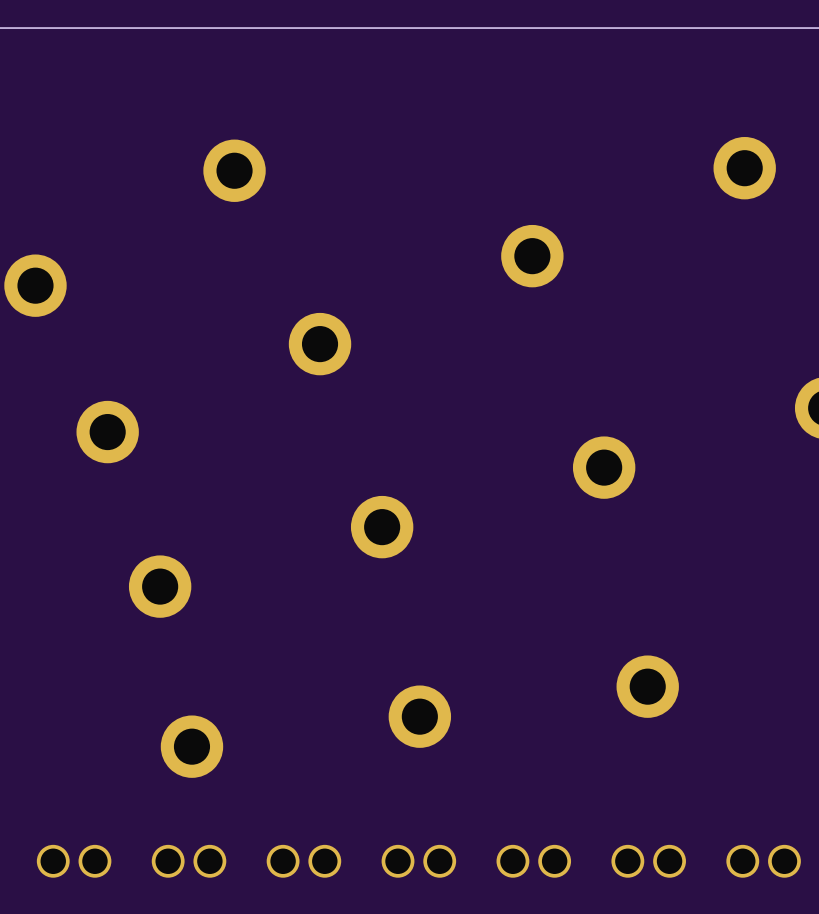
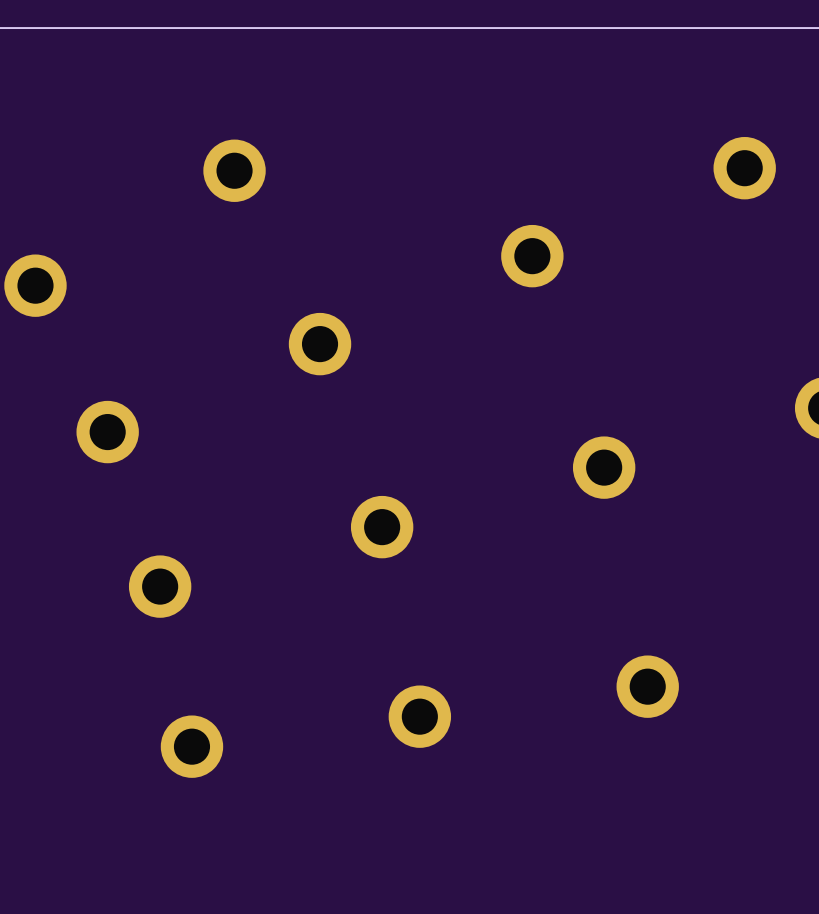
part: (53, 861) -> none
part: (94, 861) -> none
part: (168, 861) -> none
part: (209, 861) -> none
part: (283, 861) -> none
part: (324, 861) -> none
part: (398, 861) -> none
part: (439, 861) -> none
part: (512, 861) -> none
part: (554, 861) -> none
part: (627, 861) -> none
part: (669, 861) -> none
part: (742, 861) -> none
part: (784, 861) -> none

